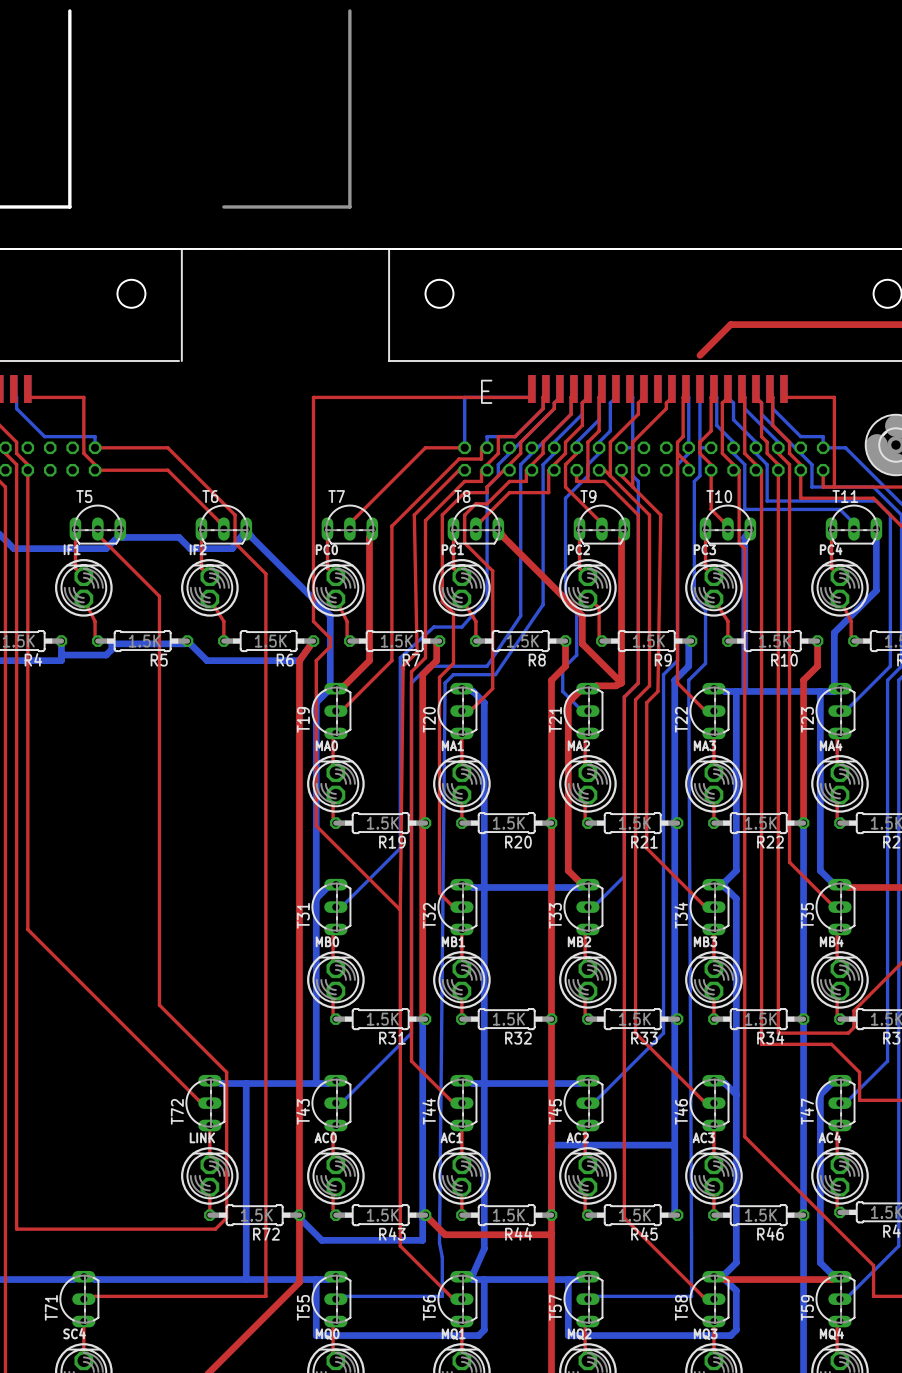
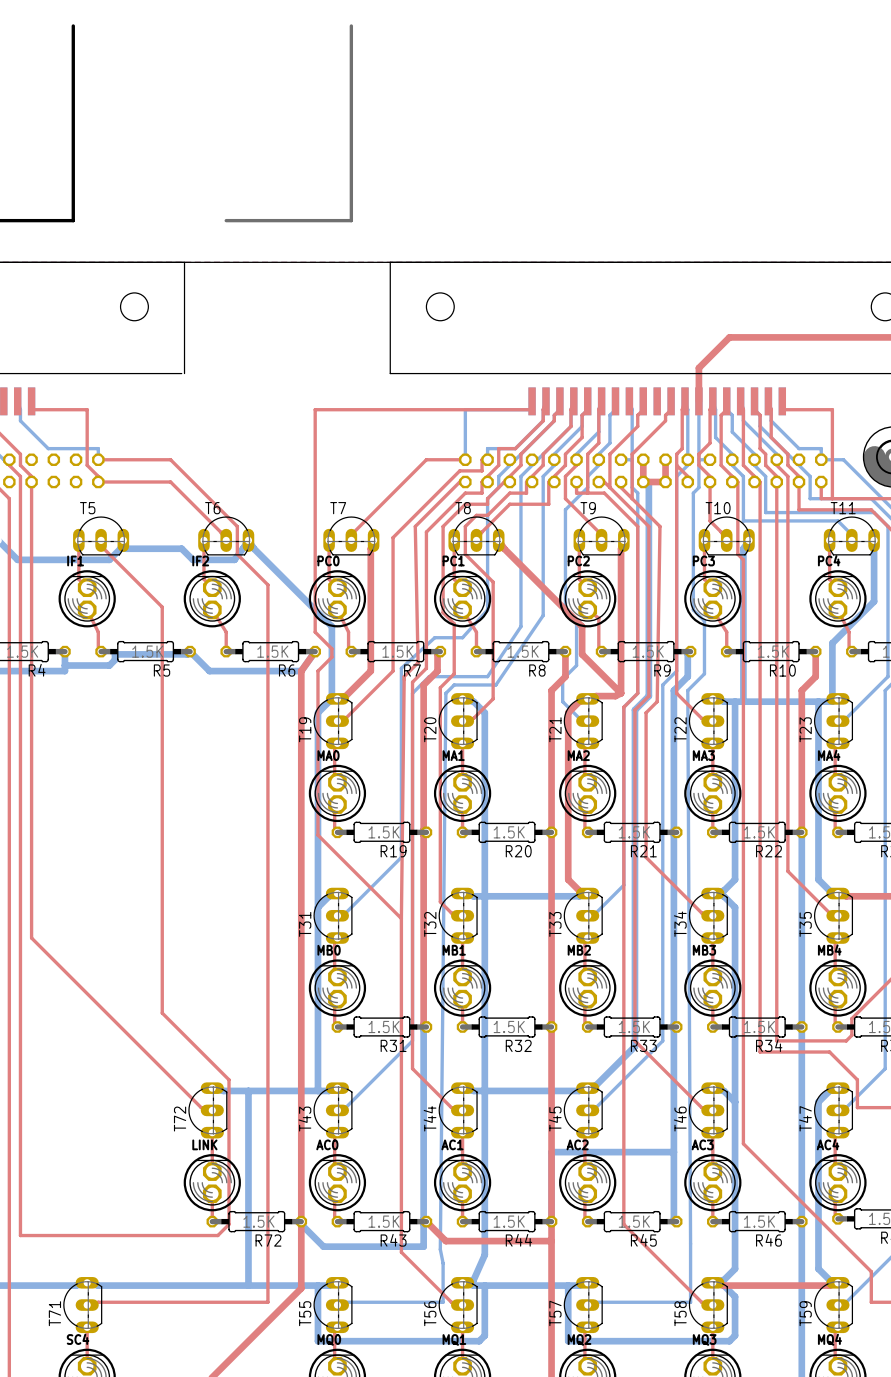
top track: none -> (698, 368) (698, 401)
text: E (486, 391) -> none
top track: none -> (643, 459) (643, 482) (665, 482) (665, 459)
bottom track: none -> (643, 482) (648, 482) (648, 696) (634, 710) (634, 1046) (596, 1085) (587, 1088)

